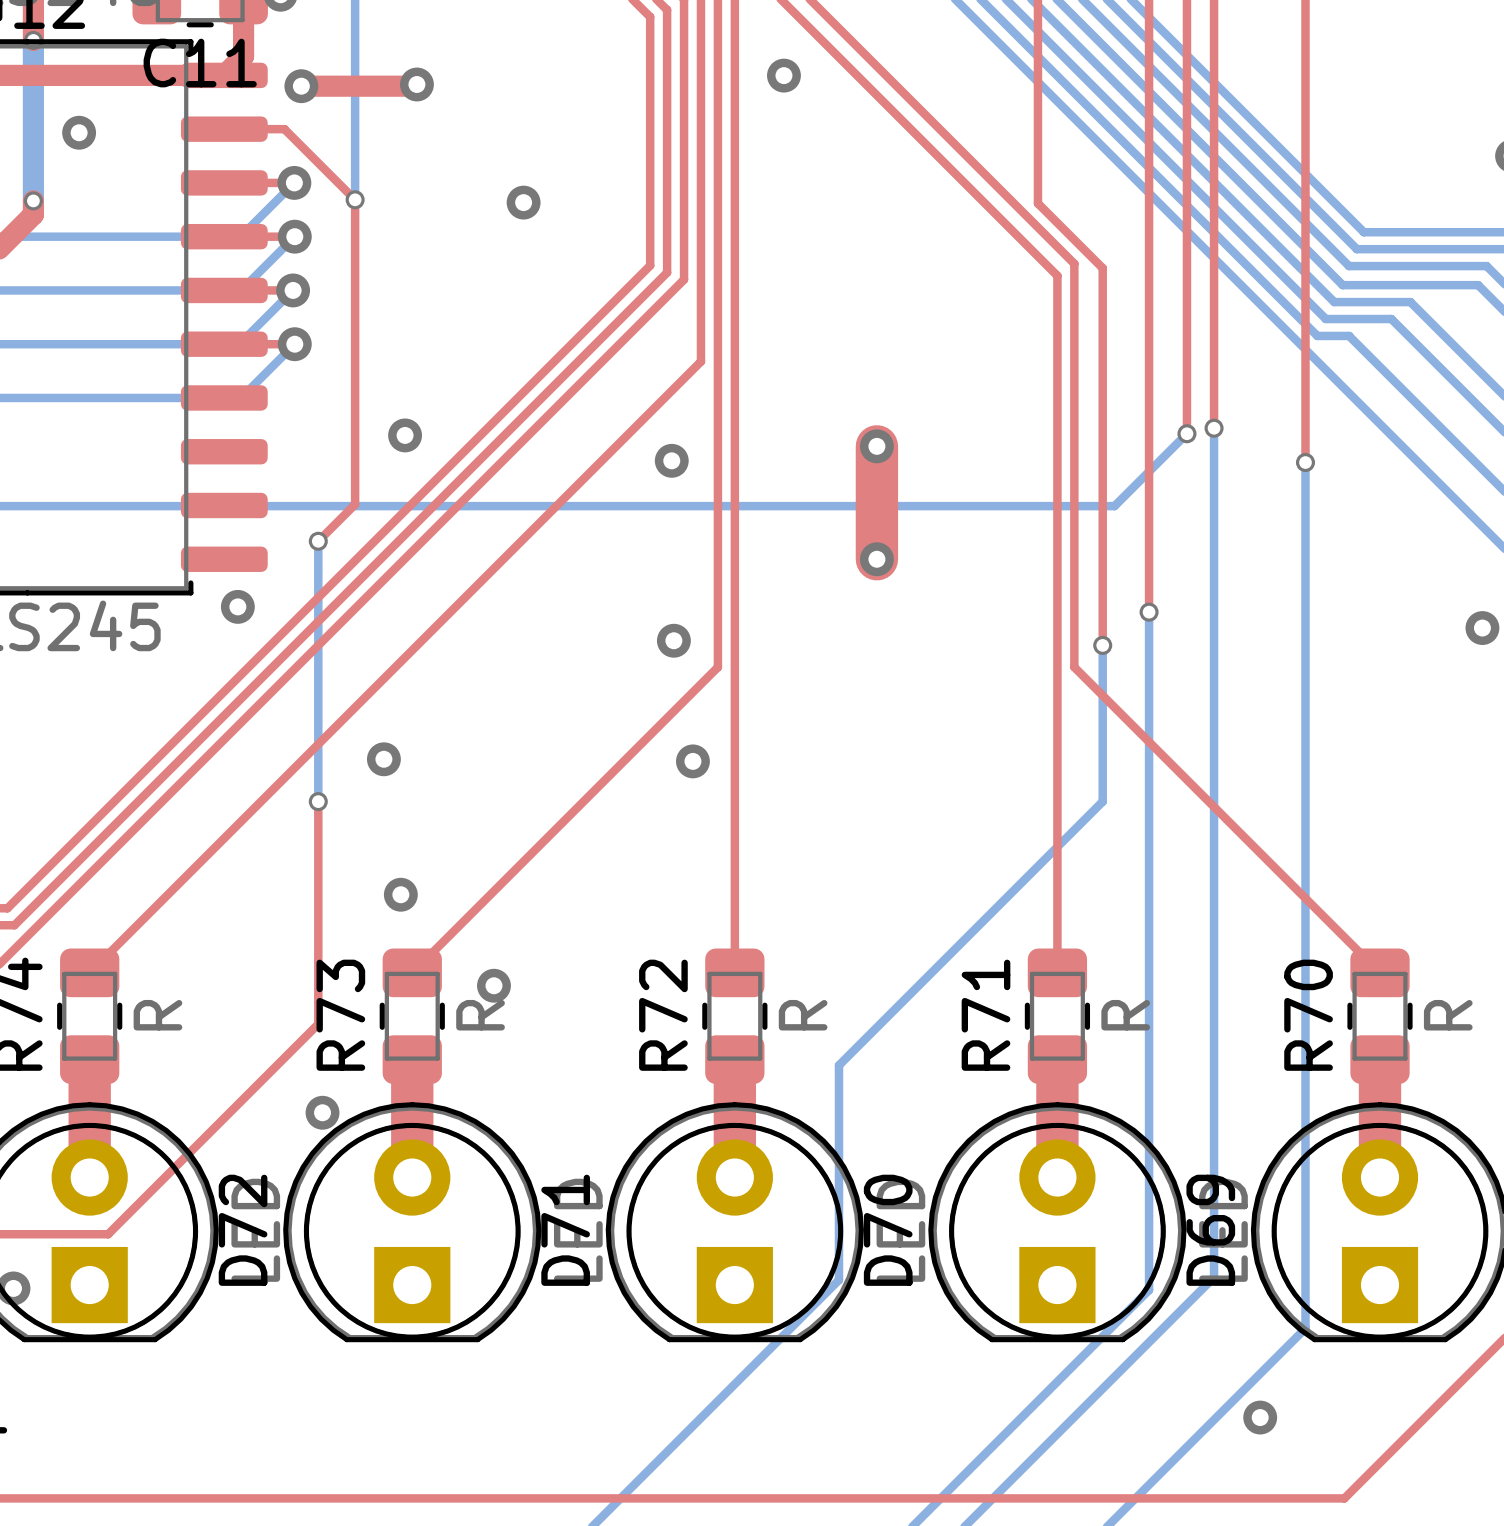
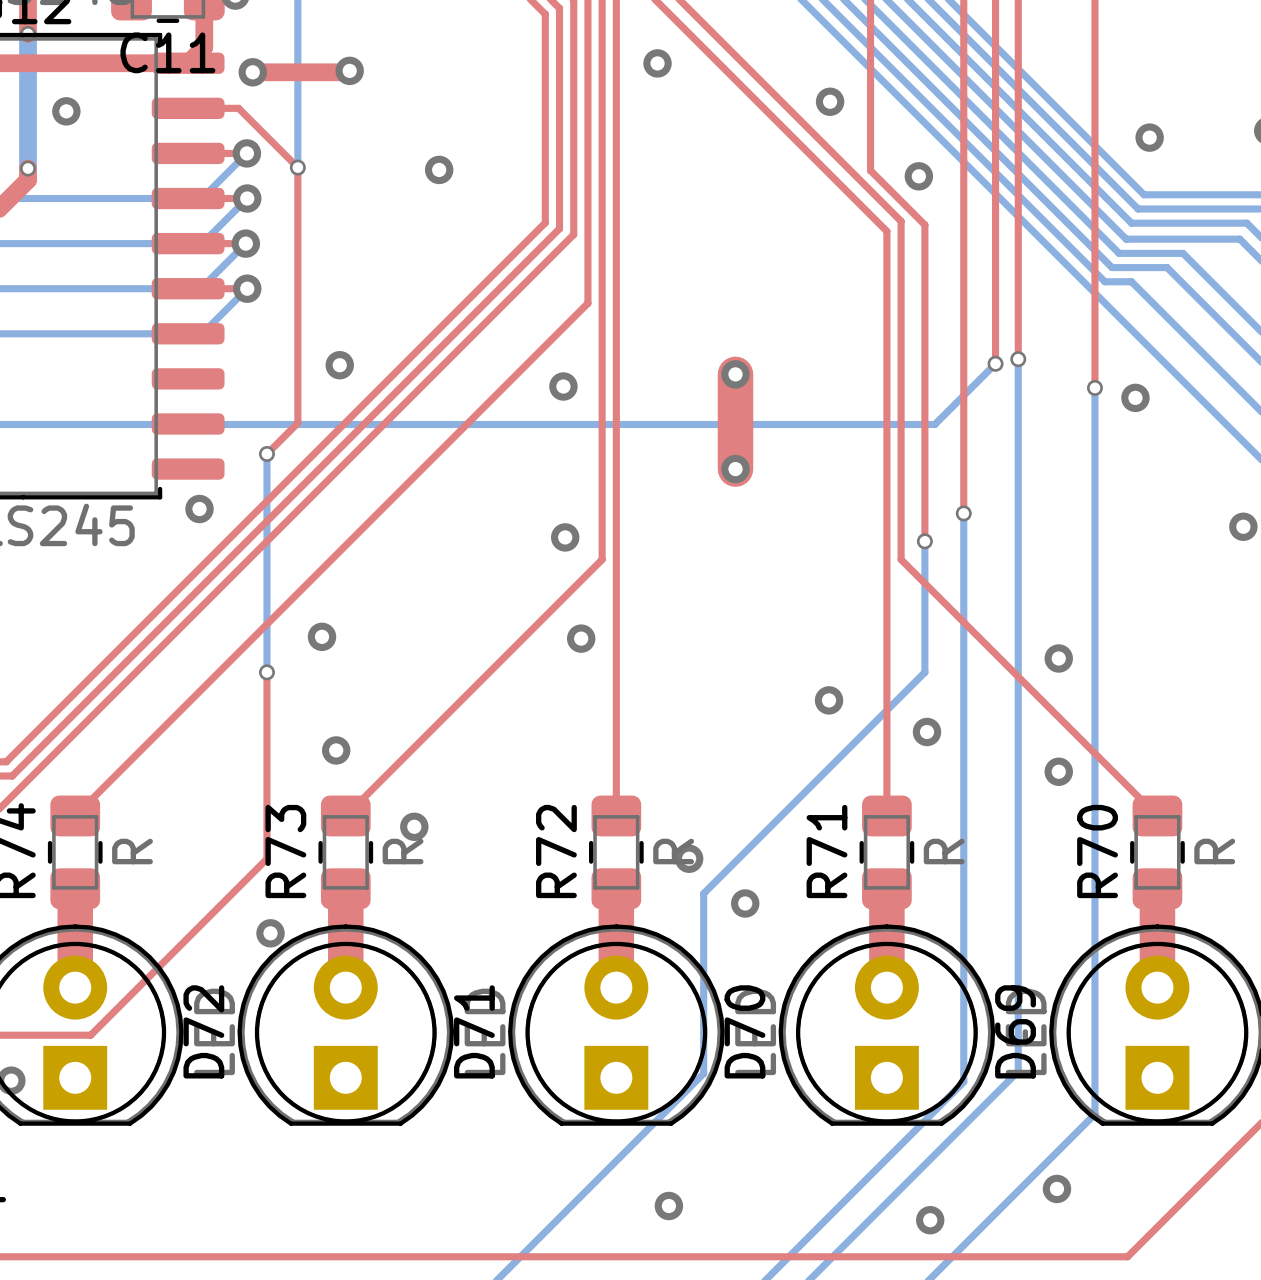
via: none -> (830, 101)
via: none -> (1149, 137)
via: none -> (918, 176)
via: none -> (1135, 397)
via: none -> (1058, 658)
via: none -> (829, 700)
via: none -> (927, 731)
via: none -> (1058, 771)
via: none -> (689, 858)
via: none -> (745, 903)
via: none -> (668, 1205)
via: none -> (930, 1220)

